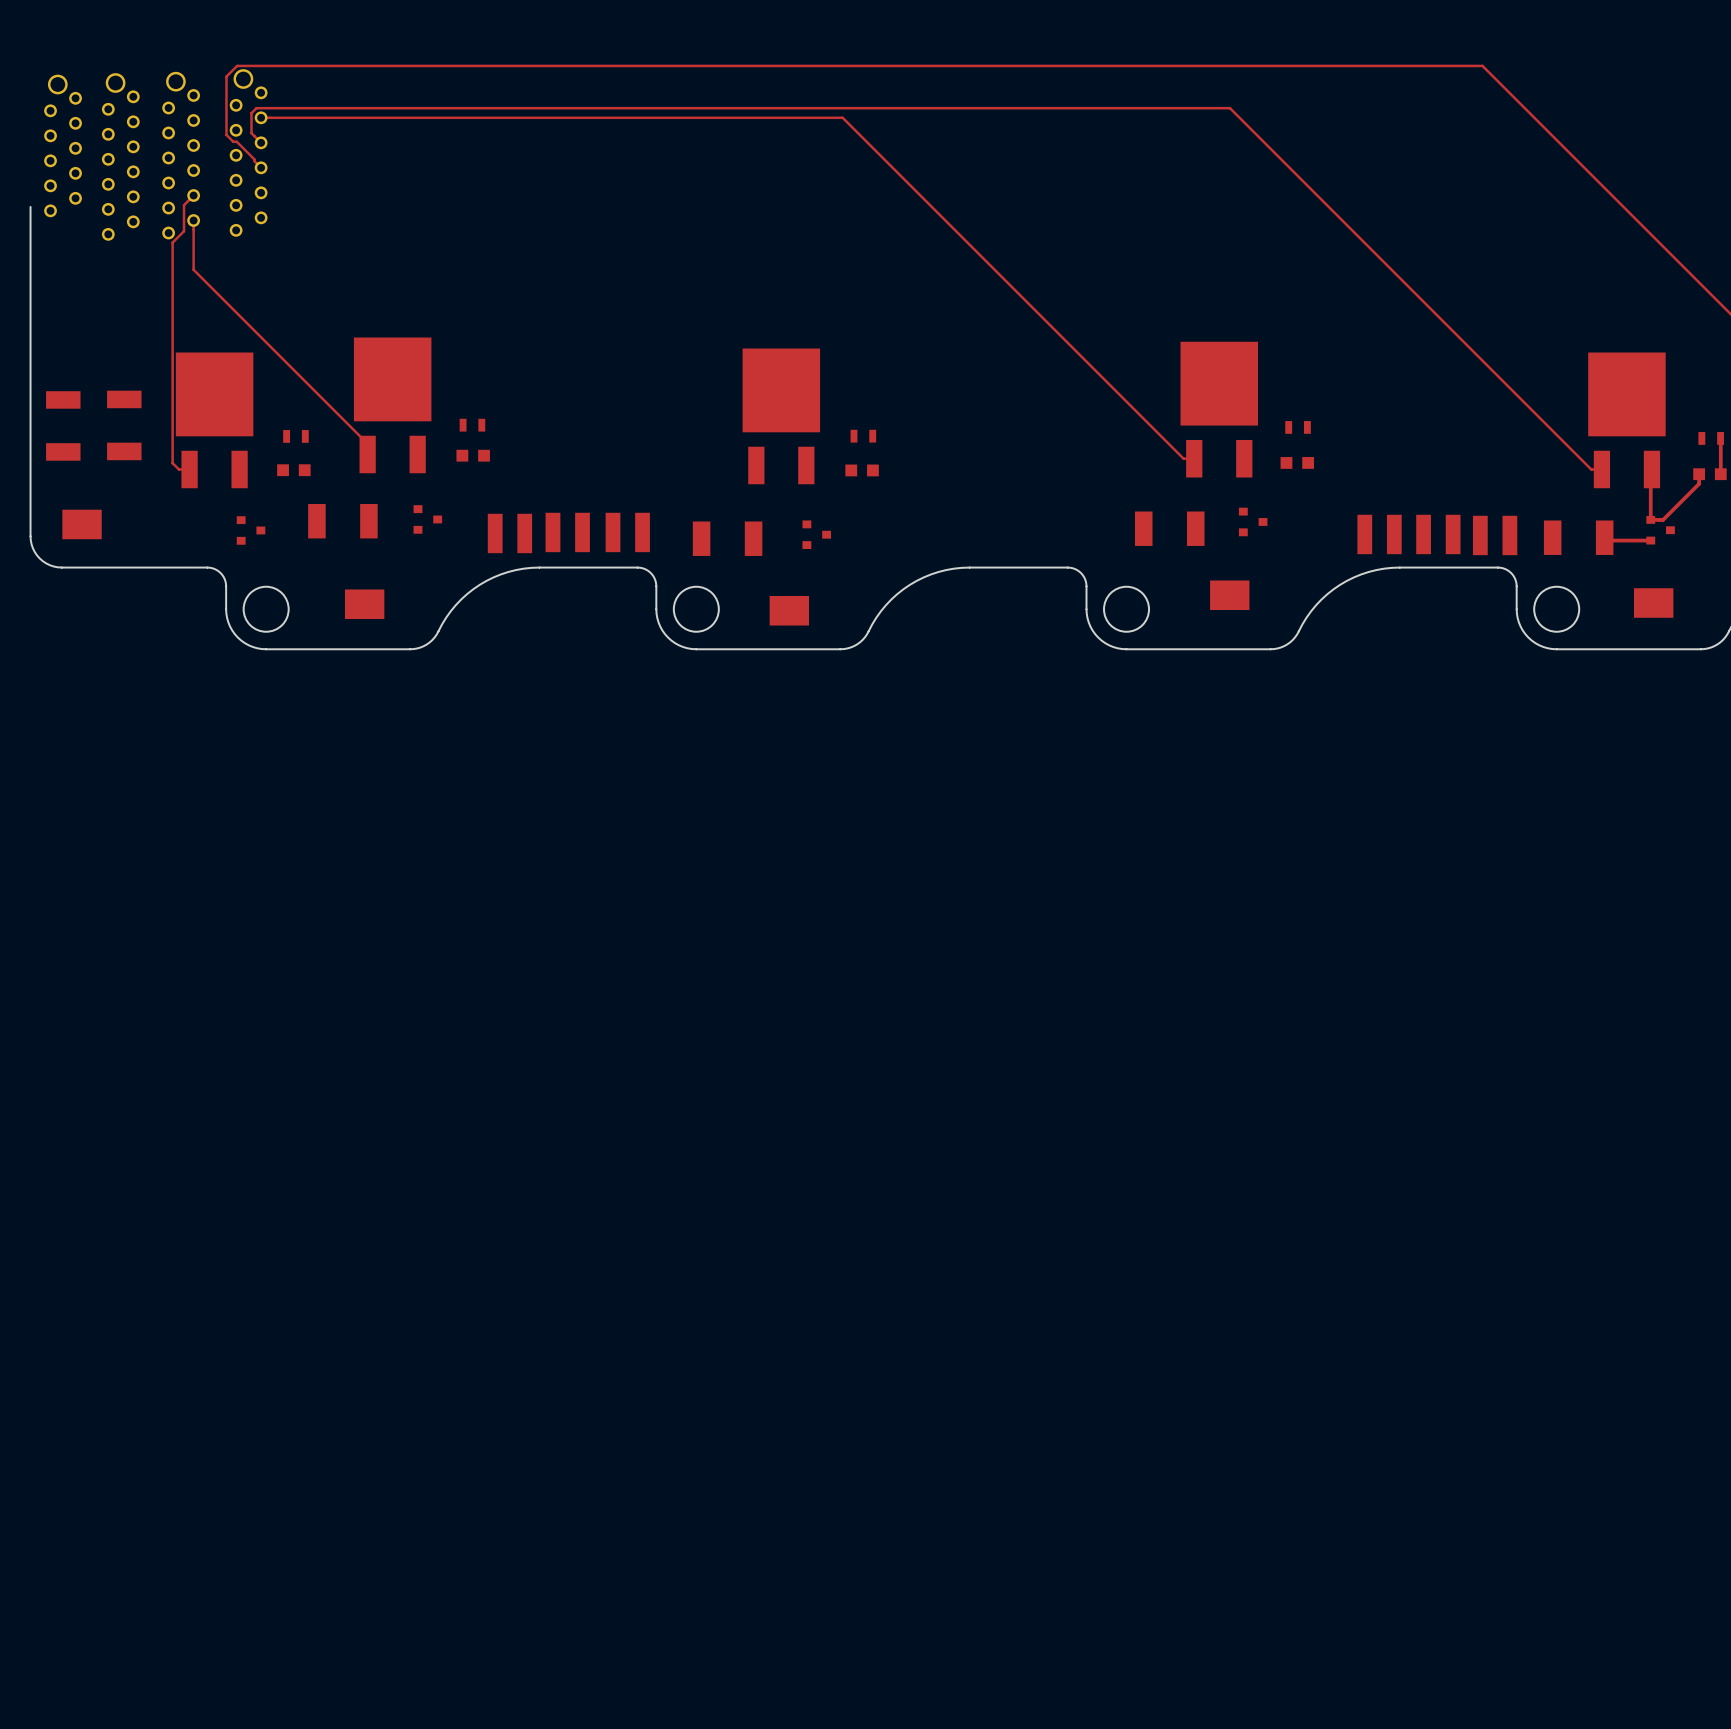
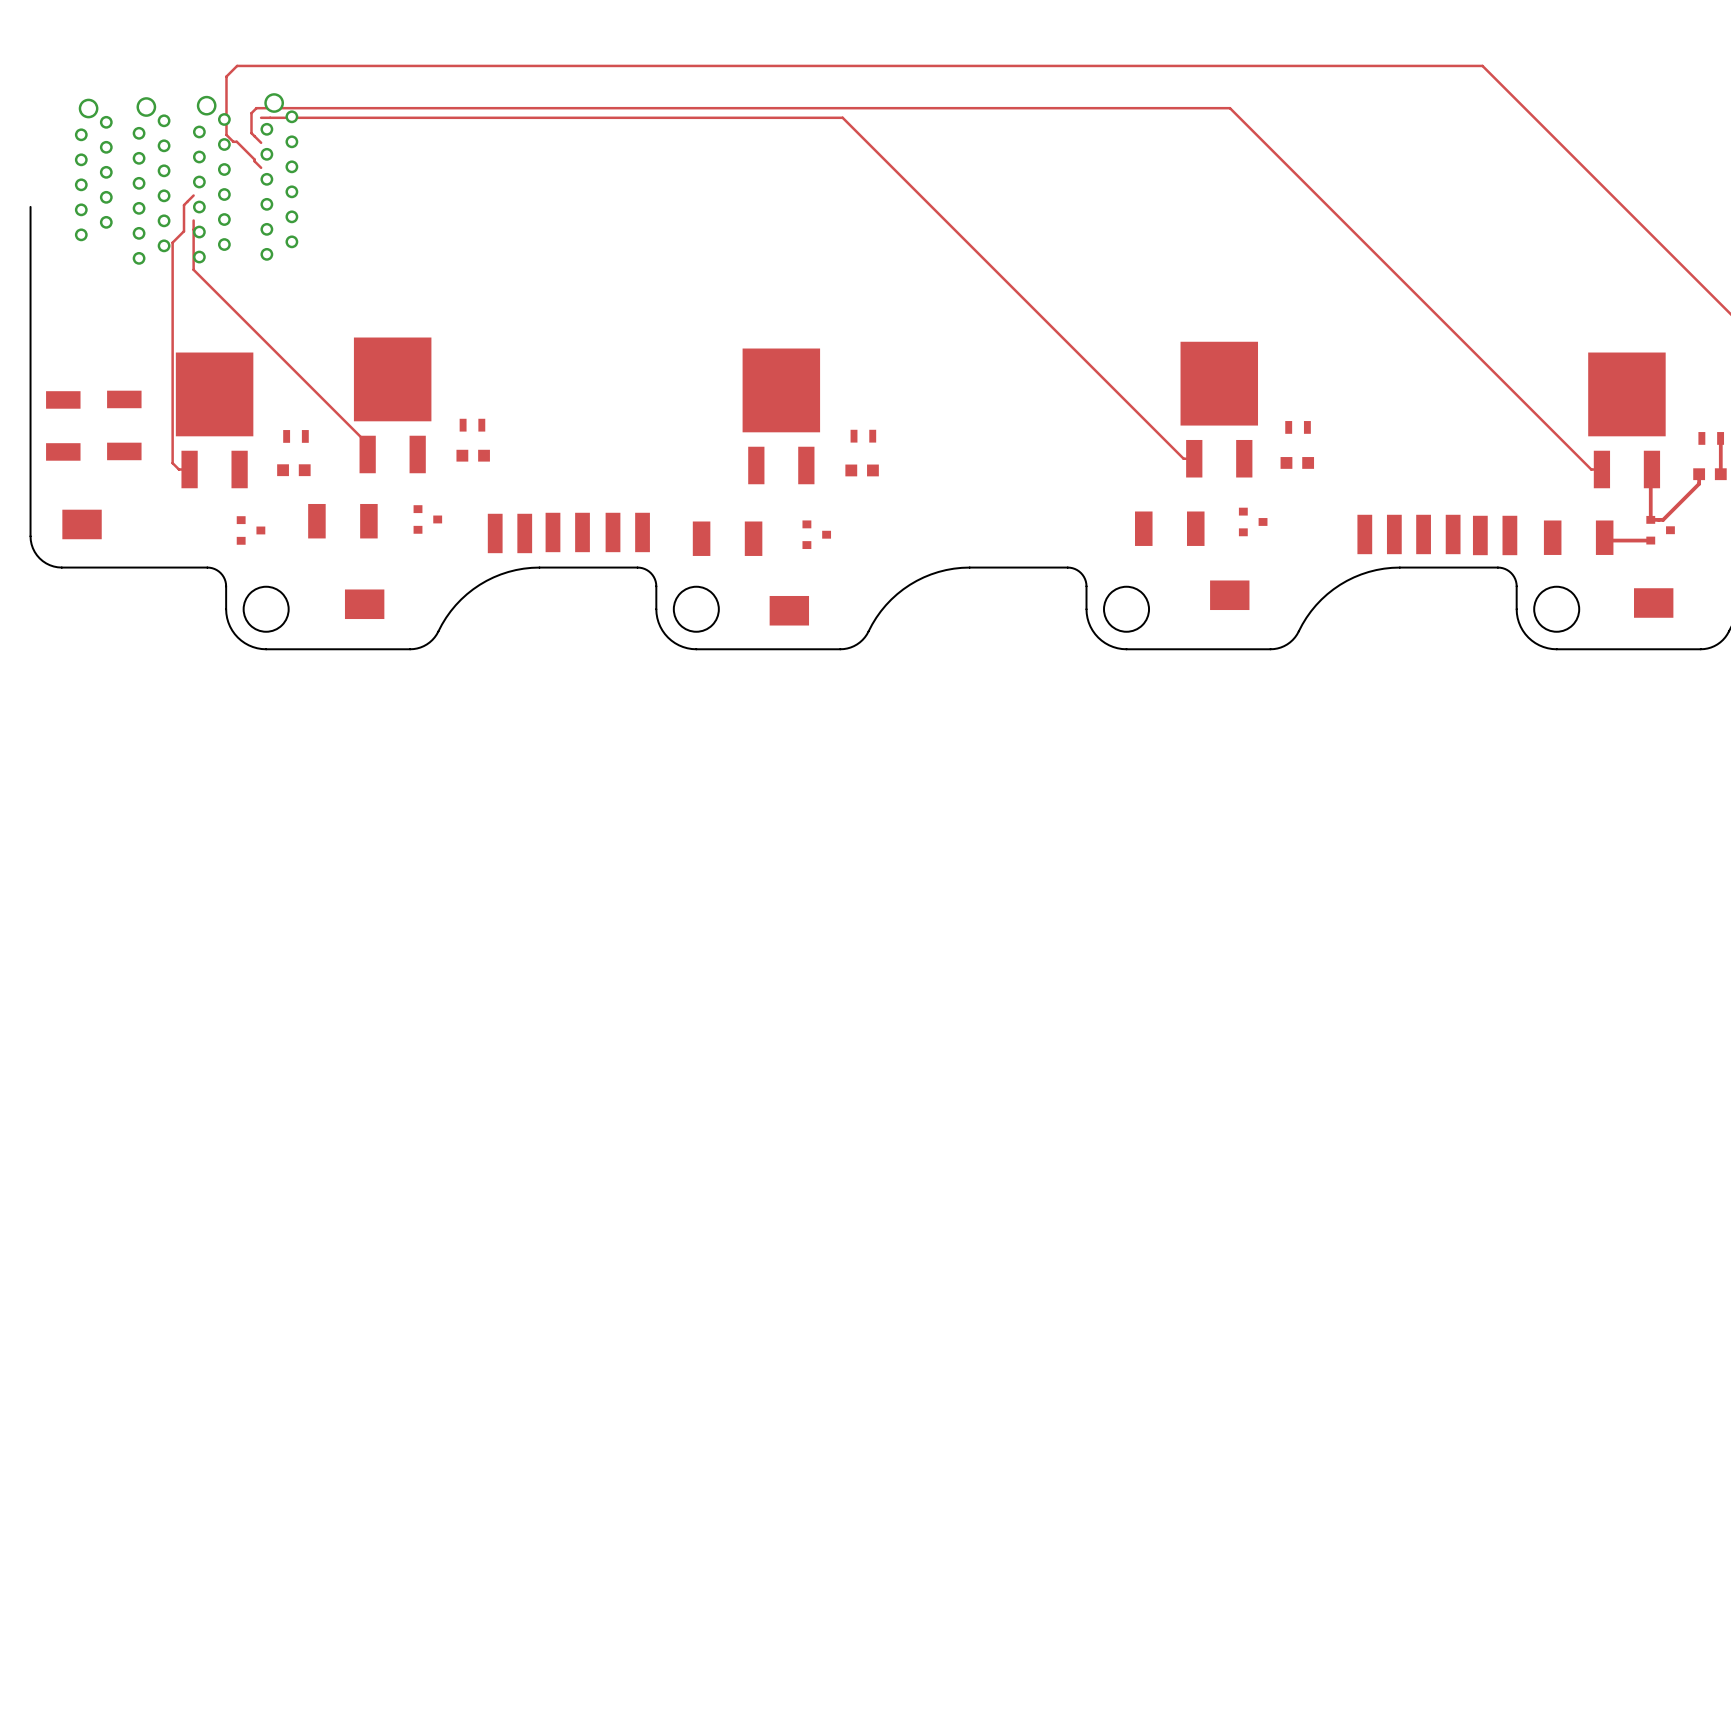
part position: (63, 145) -> (93, 169)
part: (248, 152) -> none
part: (181, 155) -> none
part: (120, 156) -> none
part: none -> (279, 176)
part: none -> (211, 179)
part: none -> (151, 180)

